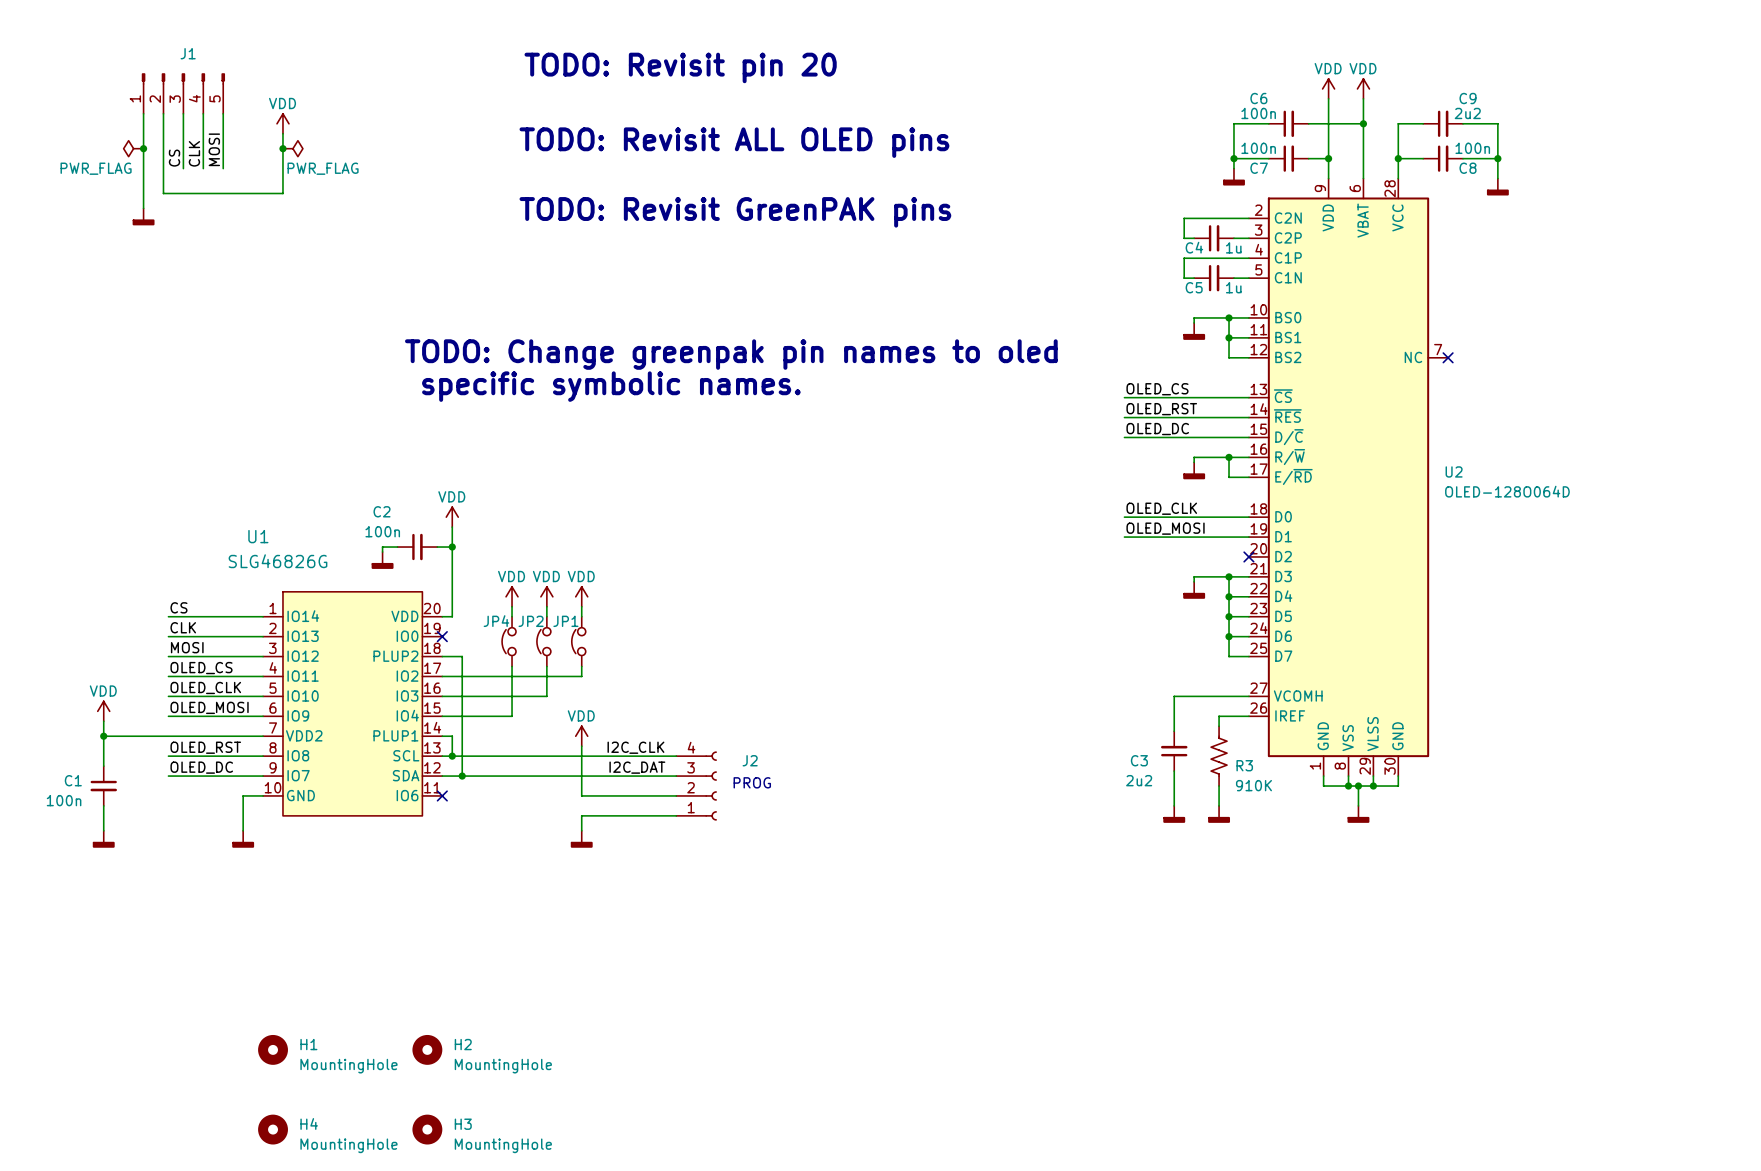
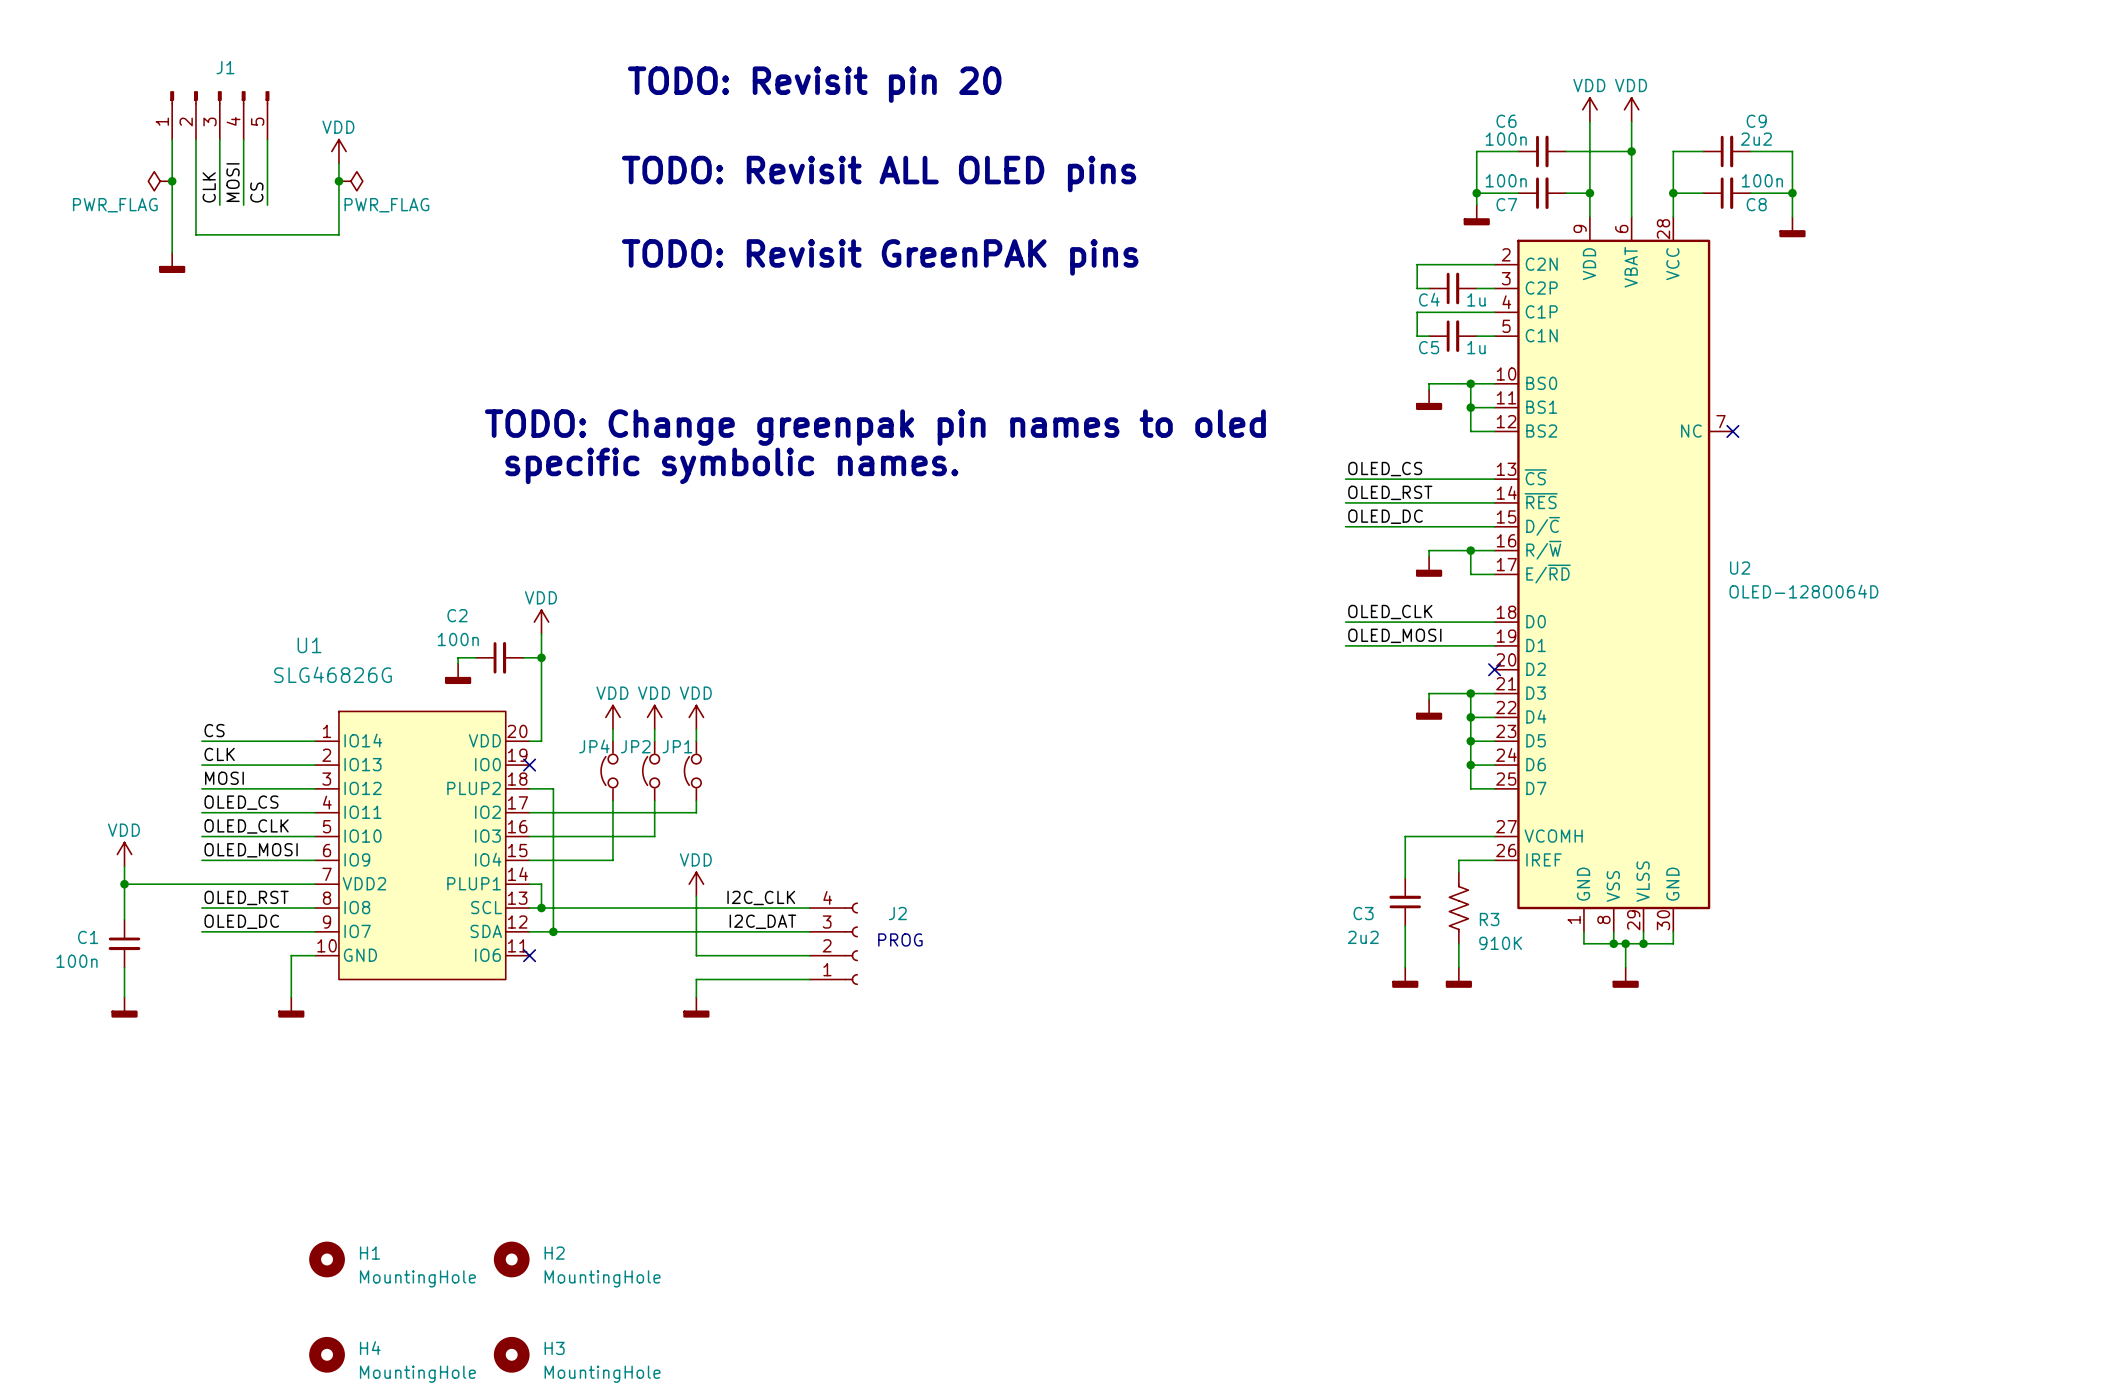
label: MOSI (214, 149) -> CS (256, 192)
label: CLK (194, 153) -> MOSI (233, 182)
label: CS (174, 158) -> CLK (209, 187)

